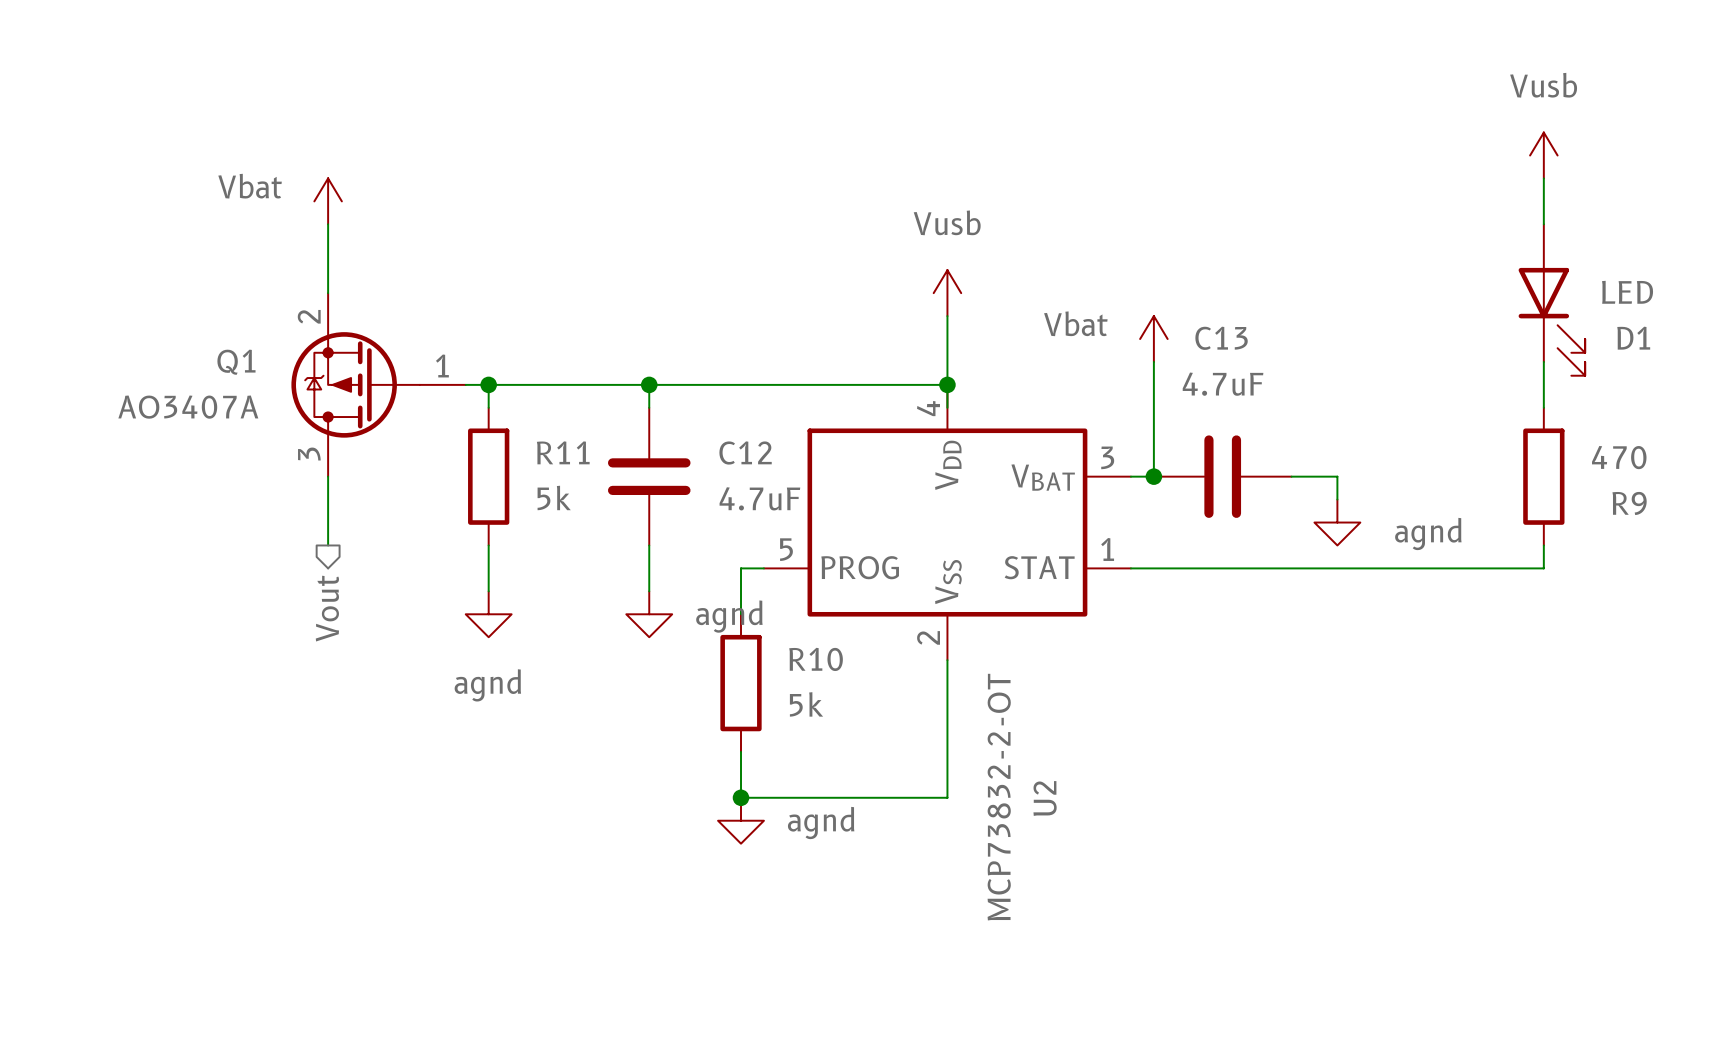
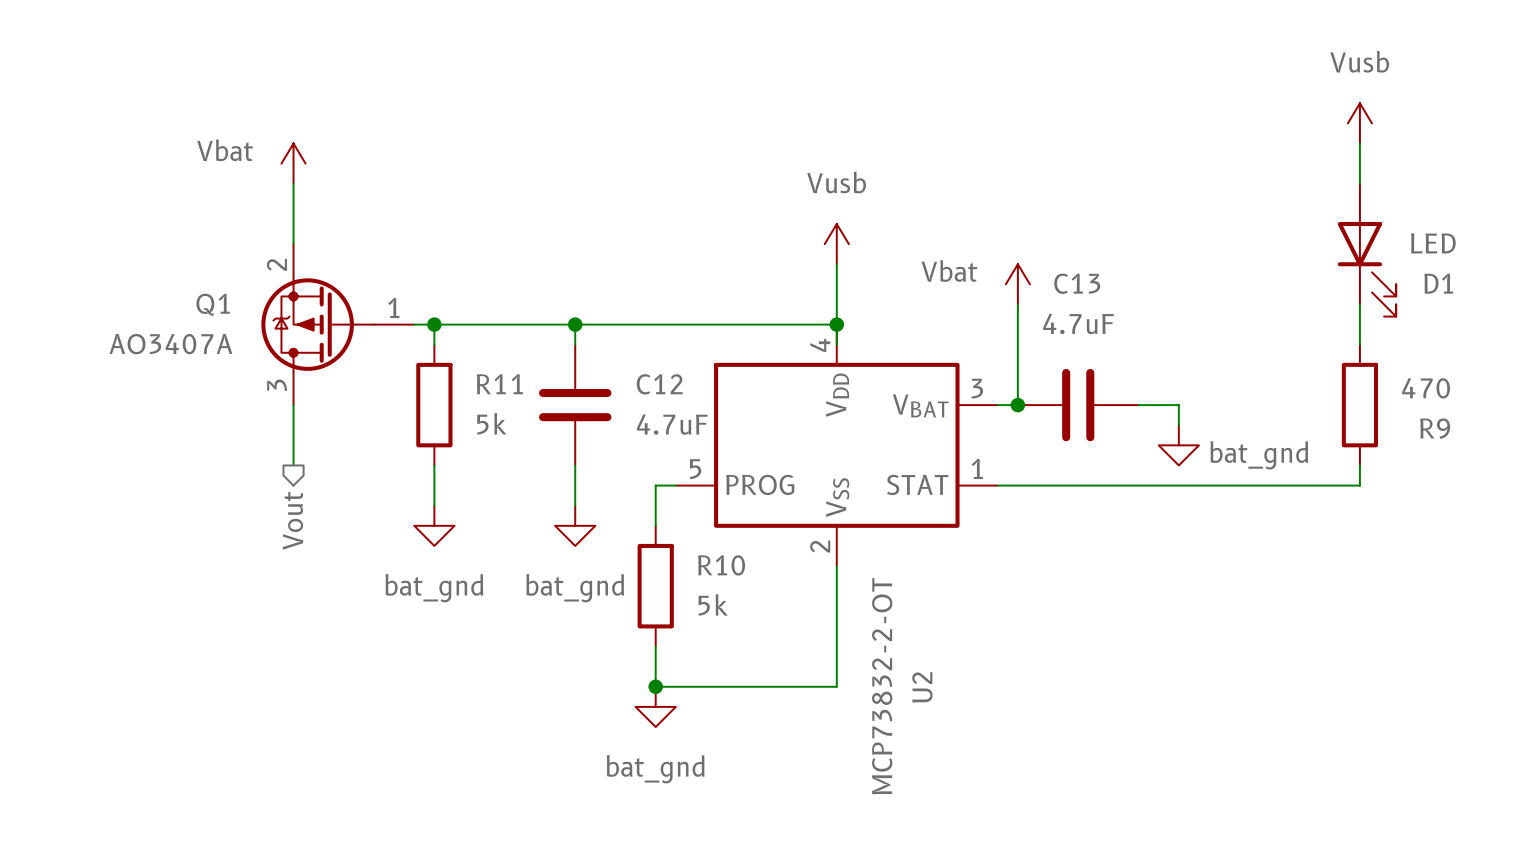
power symbol: agnd (1337, 522) -> bat_gnd (1178, 445)
power symbol: agnd (488, 614) -> bat_gnd (434, 525)
power symbol: agnd (649, 614) -> bat_gnd (575, 525)
power symbol: agnd (741, 820) -> bat_gnd (655, 706)

